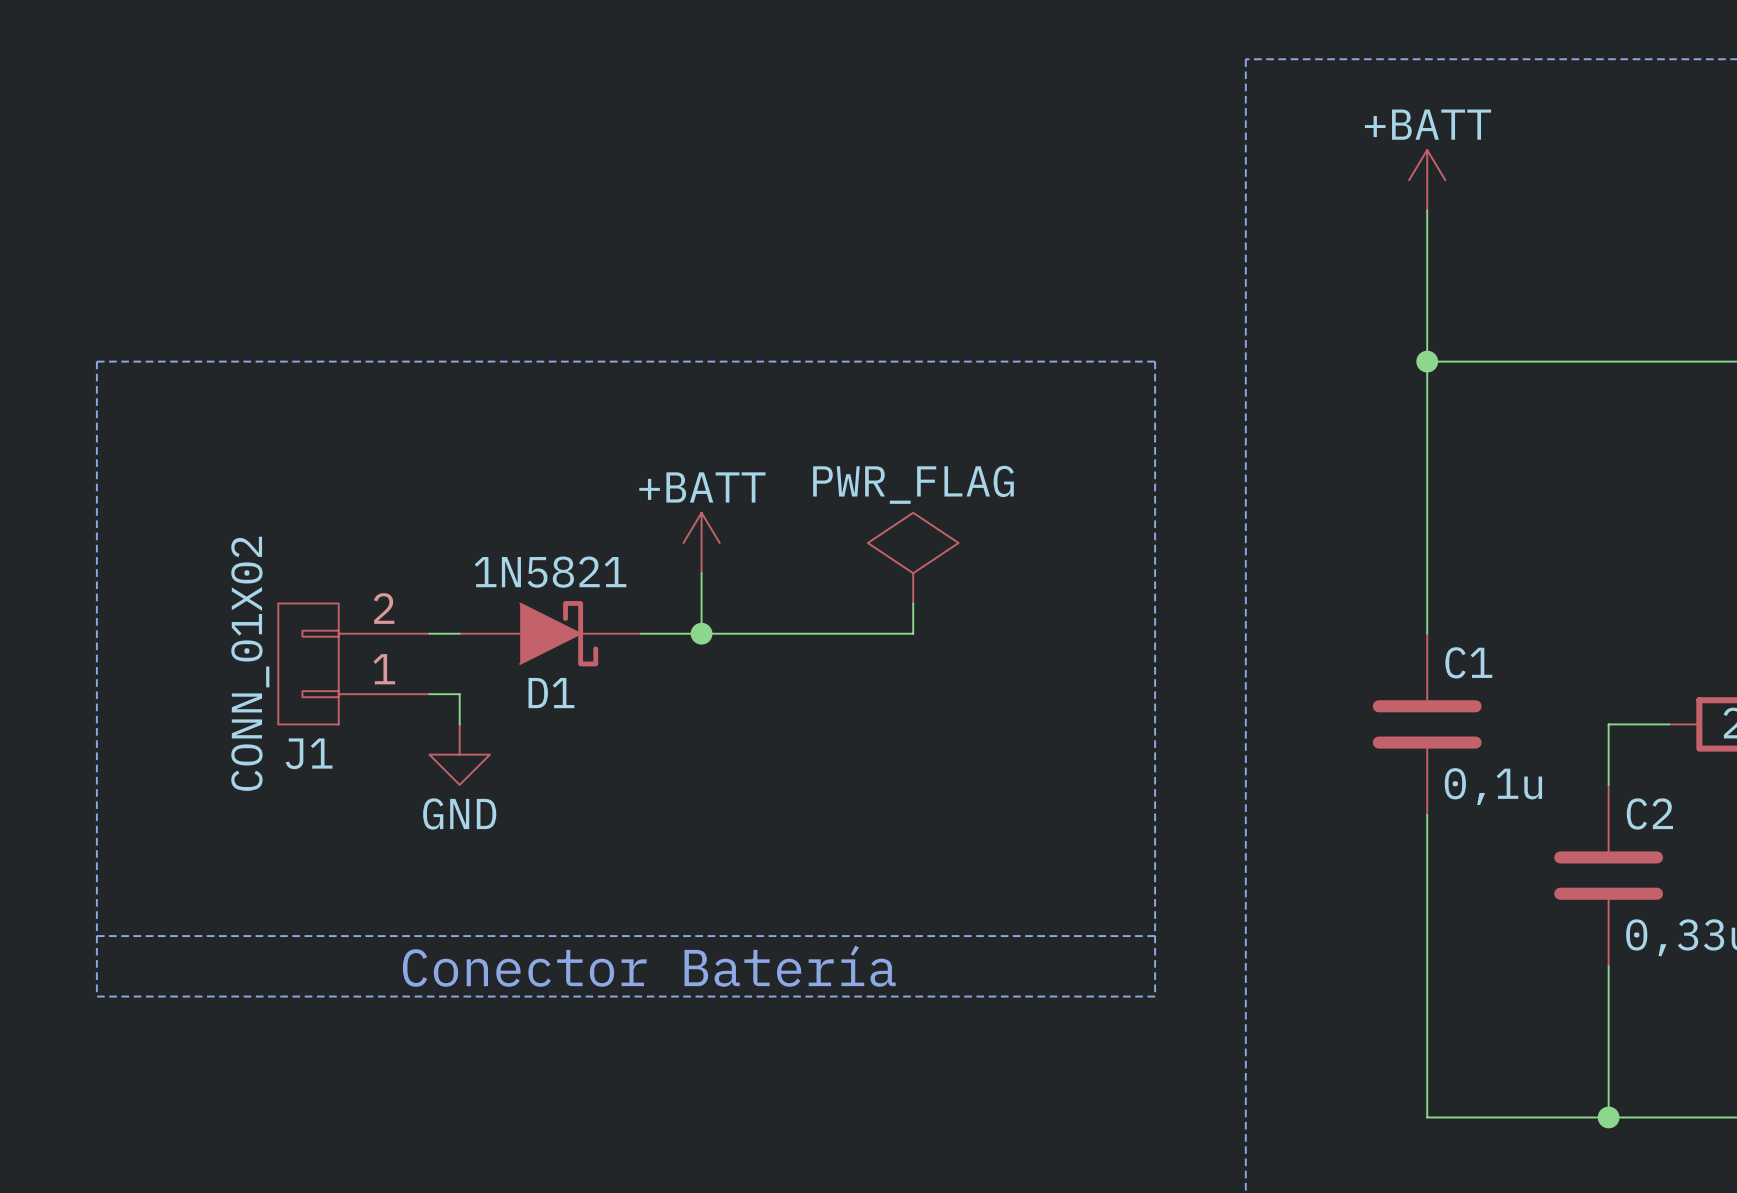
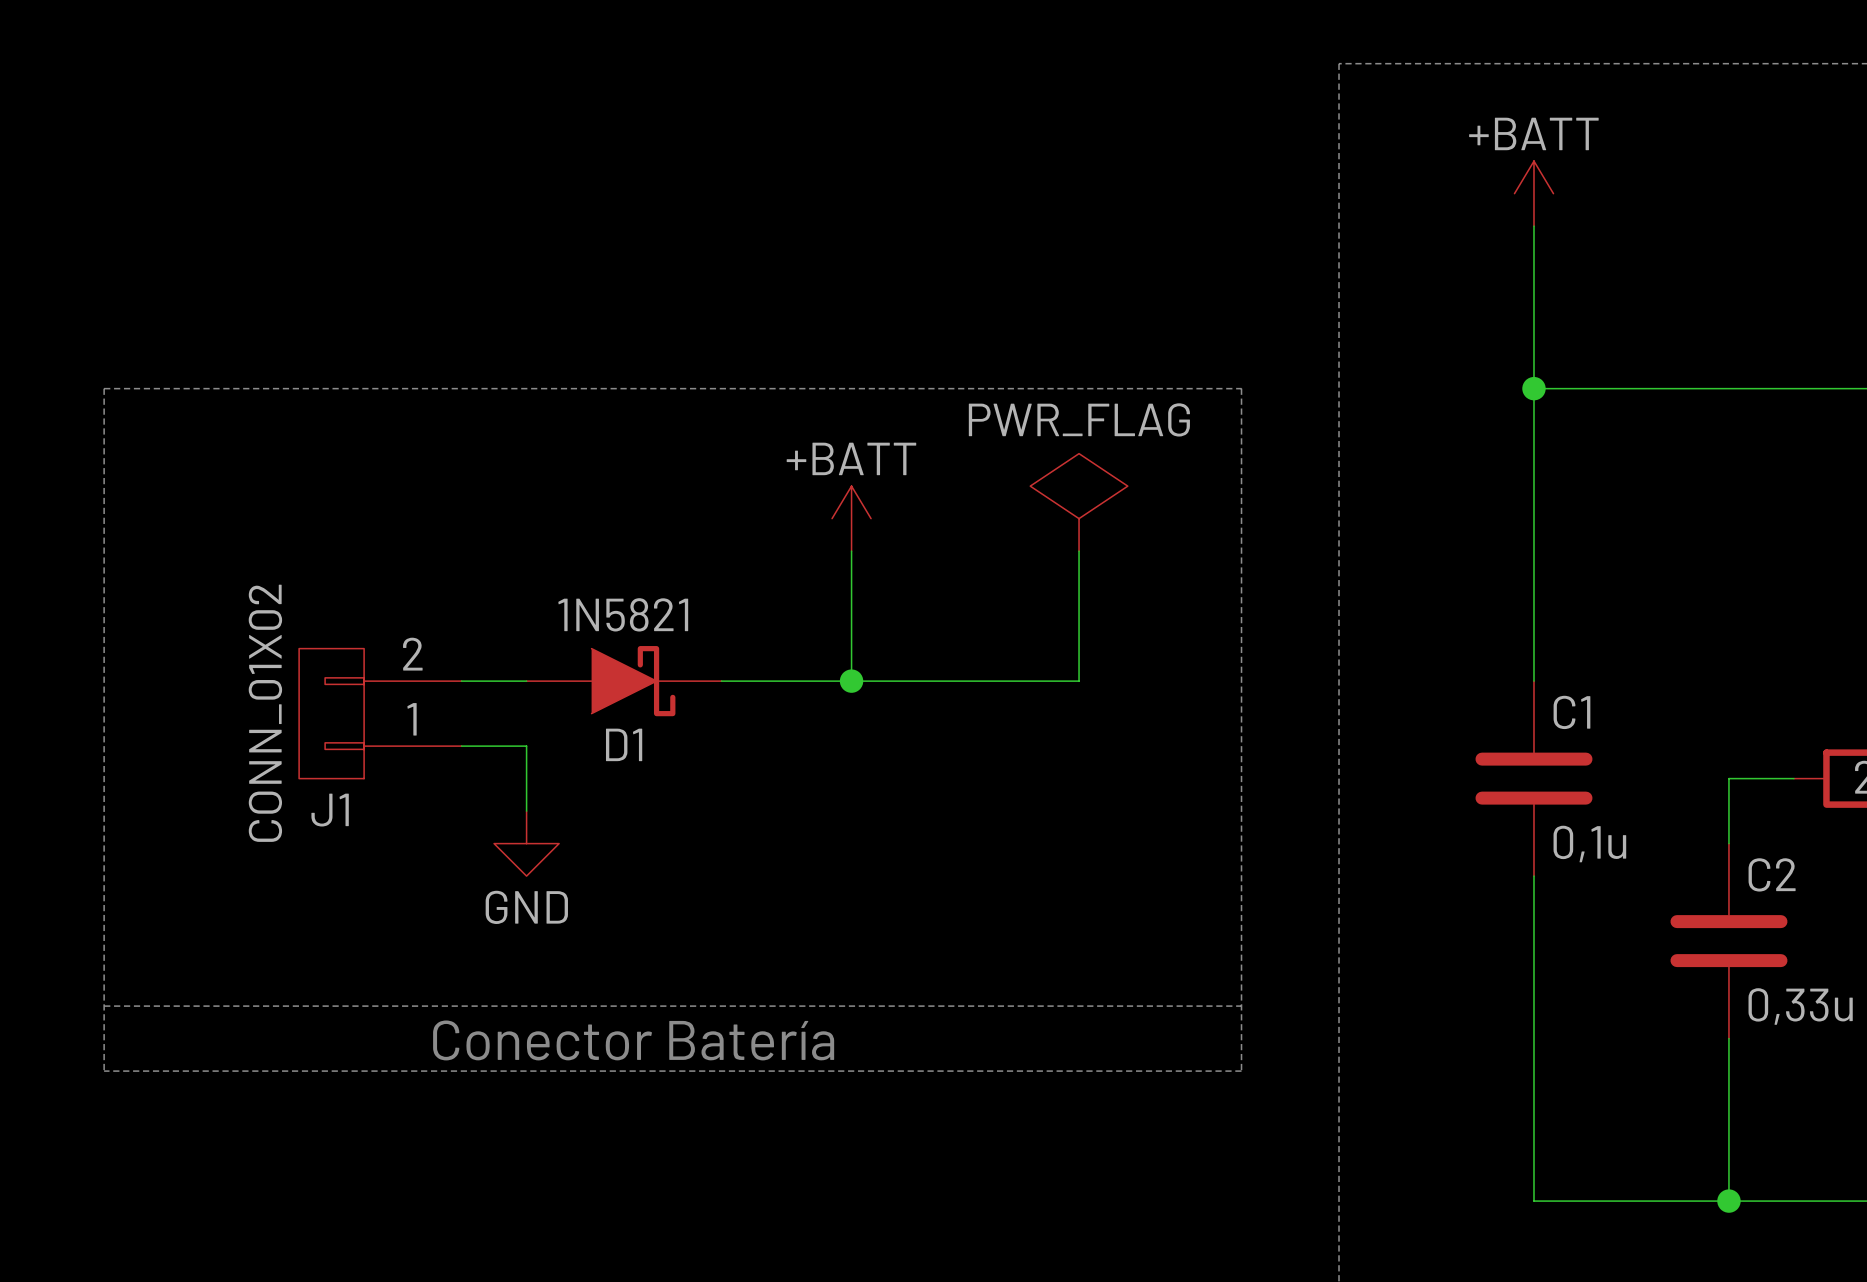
wire: none -> (851, 551) (851, 681)
power symbol position: +BATT (701, 543) -> +BATT (851, 518)
power symbol position: PWR_FLAG (913, 558) -> PWR_FLAG (1079, 502)
wire: (701, 573) (701, 633) -> none
wire: (913, 603) (913, 633) -> (1079, 551) (1079, 681) (981, 681)
D1 position: (550, 633) -> (624, 681)
junction position: (701, 633) -> (851, 681)
wire: (459, 694) (459, 724) -> (494, 746) (526, 746) (526, 811)
power symbol position: GND (459, 754) -> GND (526, 843)

